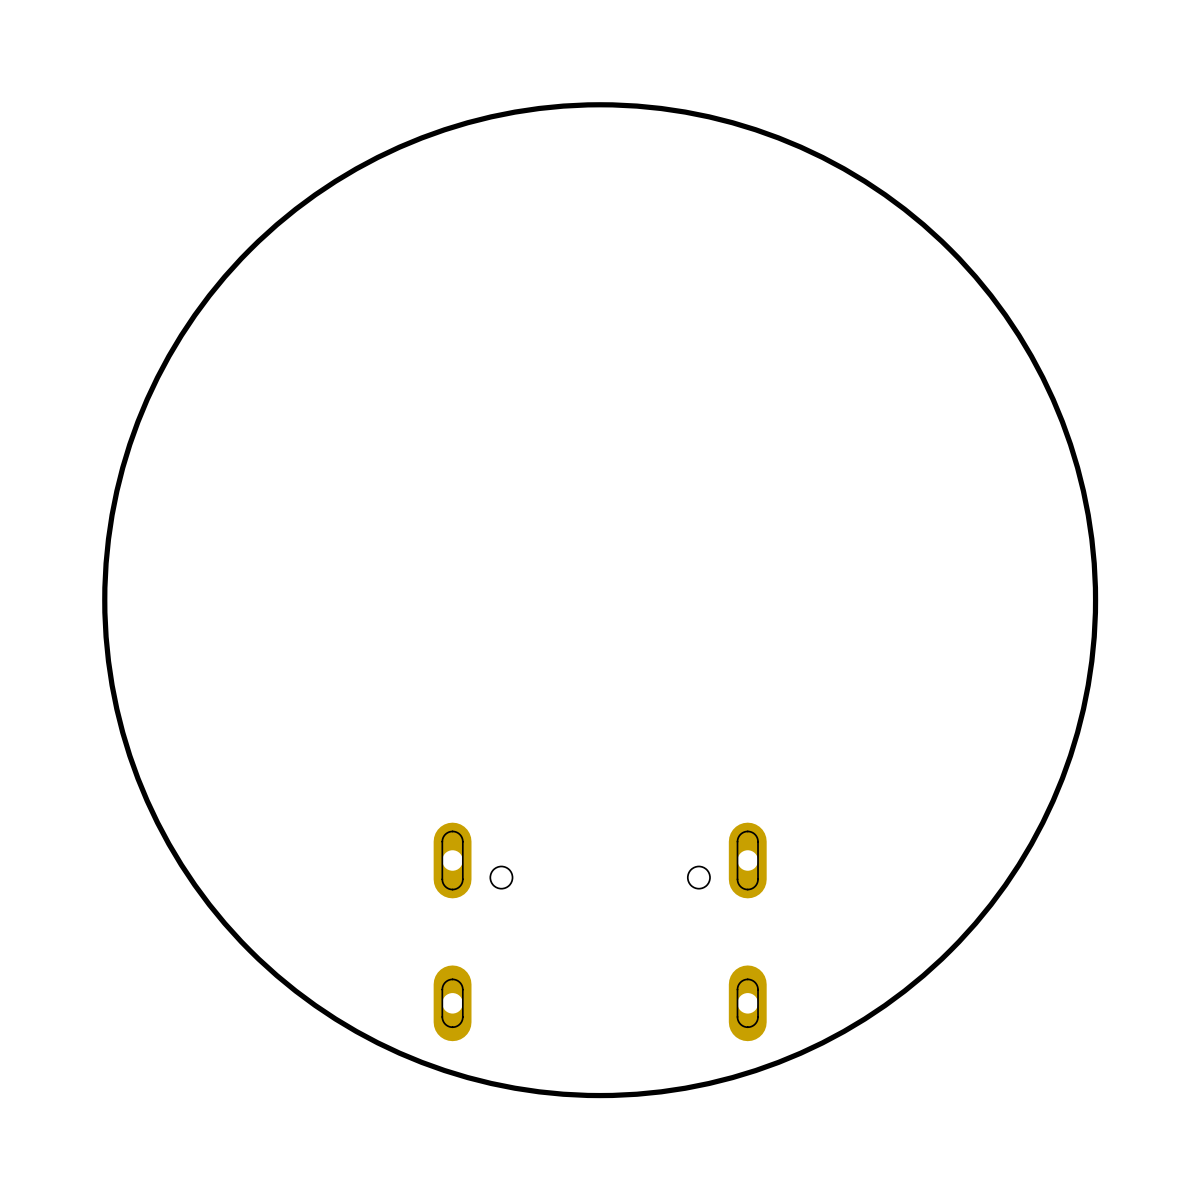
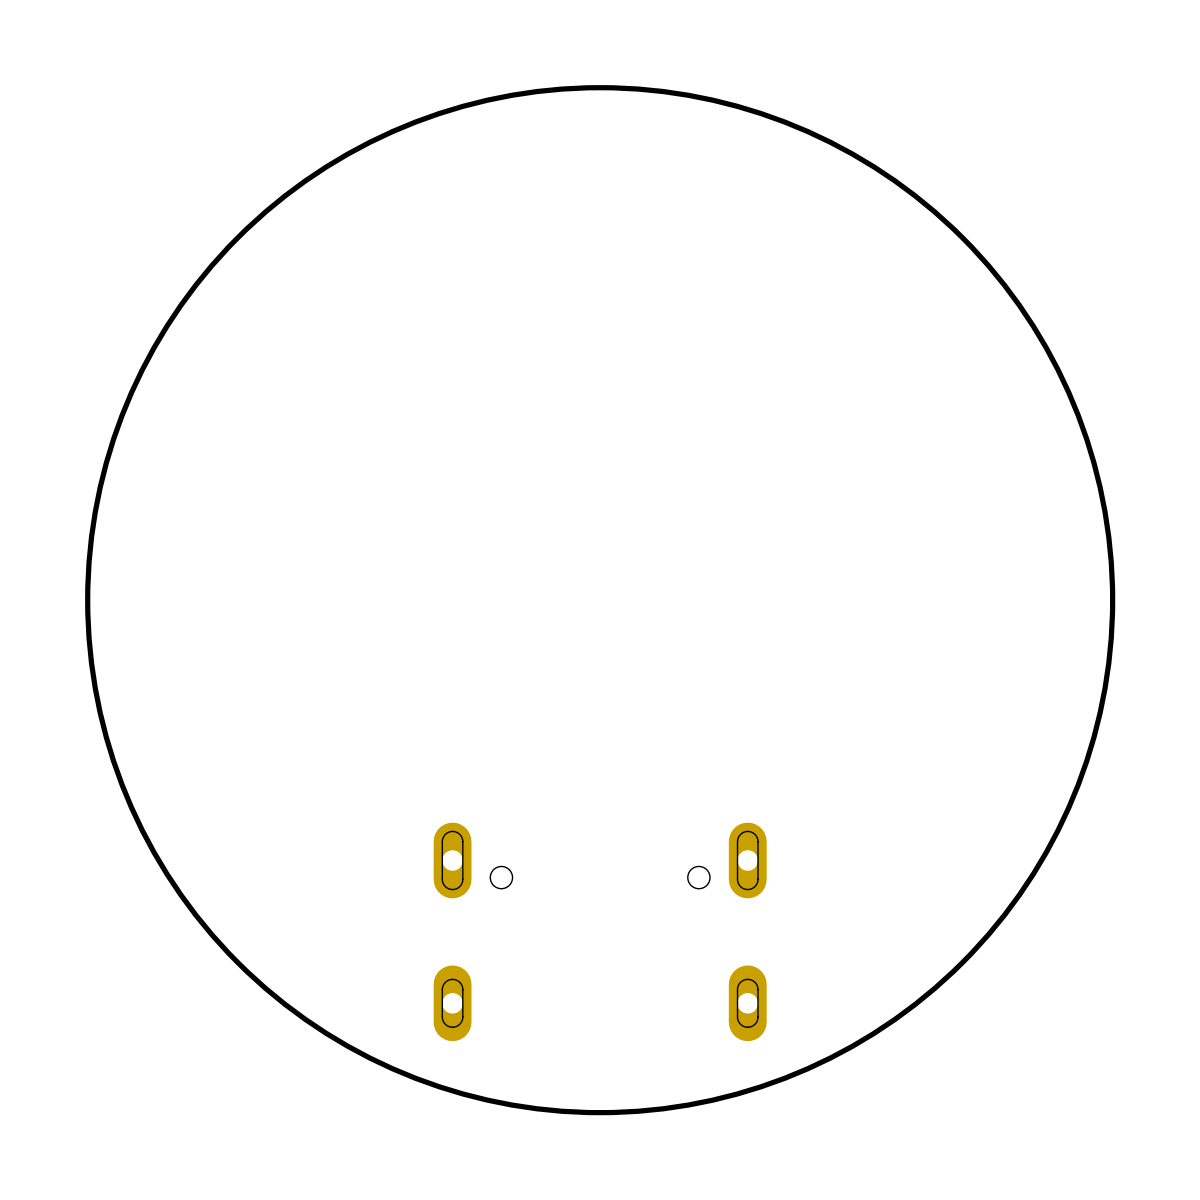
round board edge size: [102, 102, 1099, 1099] -> [85, 85, 1116, 1116]

